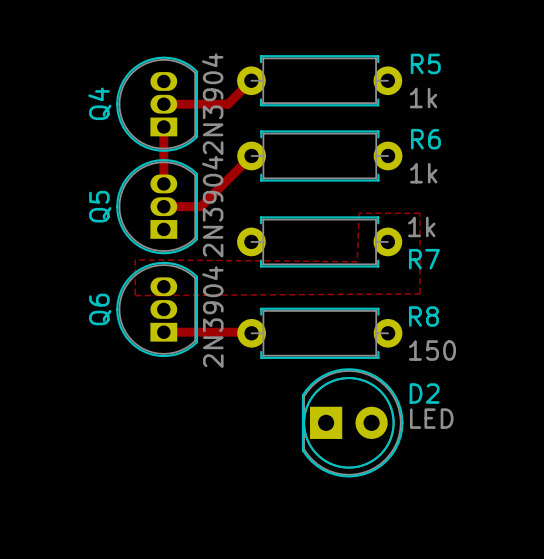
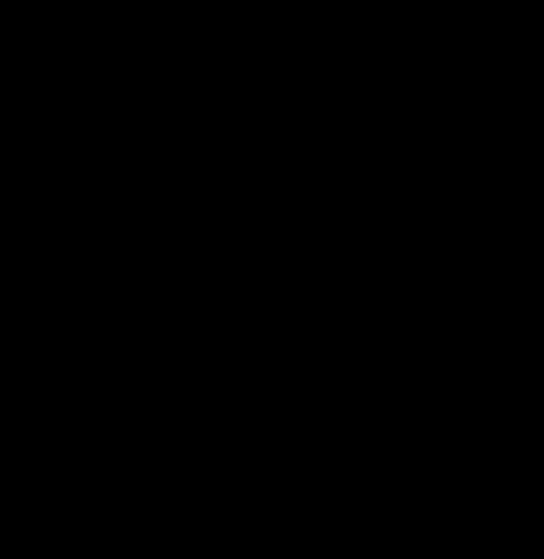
track: (251, 80) (227, 104) (163, 104) -> none
R5: 1k (319, 80) -> none
Q4: 2N3904 (157, 104) -> none
track: (163, 126) (163, 183) -> none
track: (251, 155) (200, 206) (163, 206) -> none
R6: 1k (319, 155) -> none
Q5: 2N3904 (157, 206) -> none
zone outline: (359, 213) (419, 213) (419, 293) (135, 295) (135, 259) (357, 261) (359, 213) -> none
R7: 1k (319, 241) -> none
Q6: 2N3904 (157, 309) -> none
track: (163, 332) (251, 333) -> none
R8: 150 (319, 333) -> none
D2: LED (352, 422) -> none

